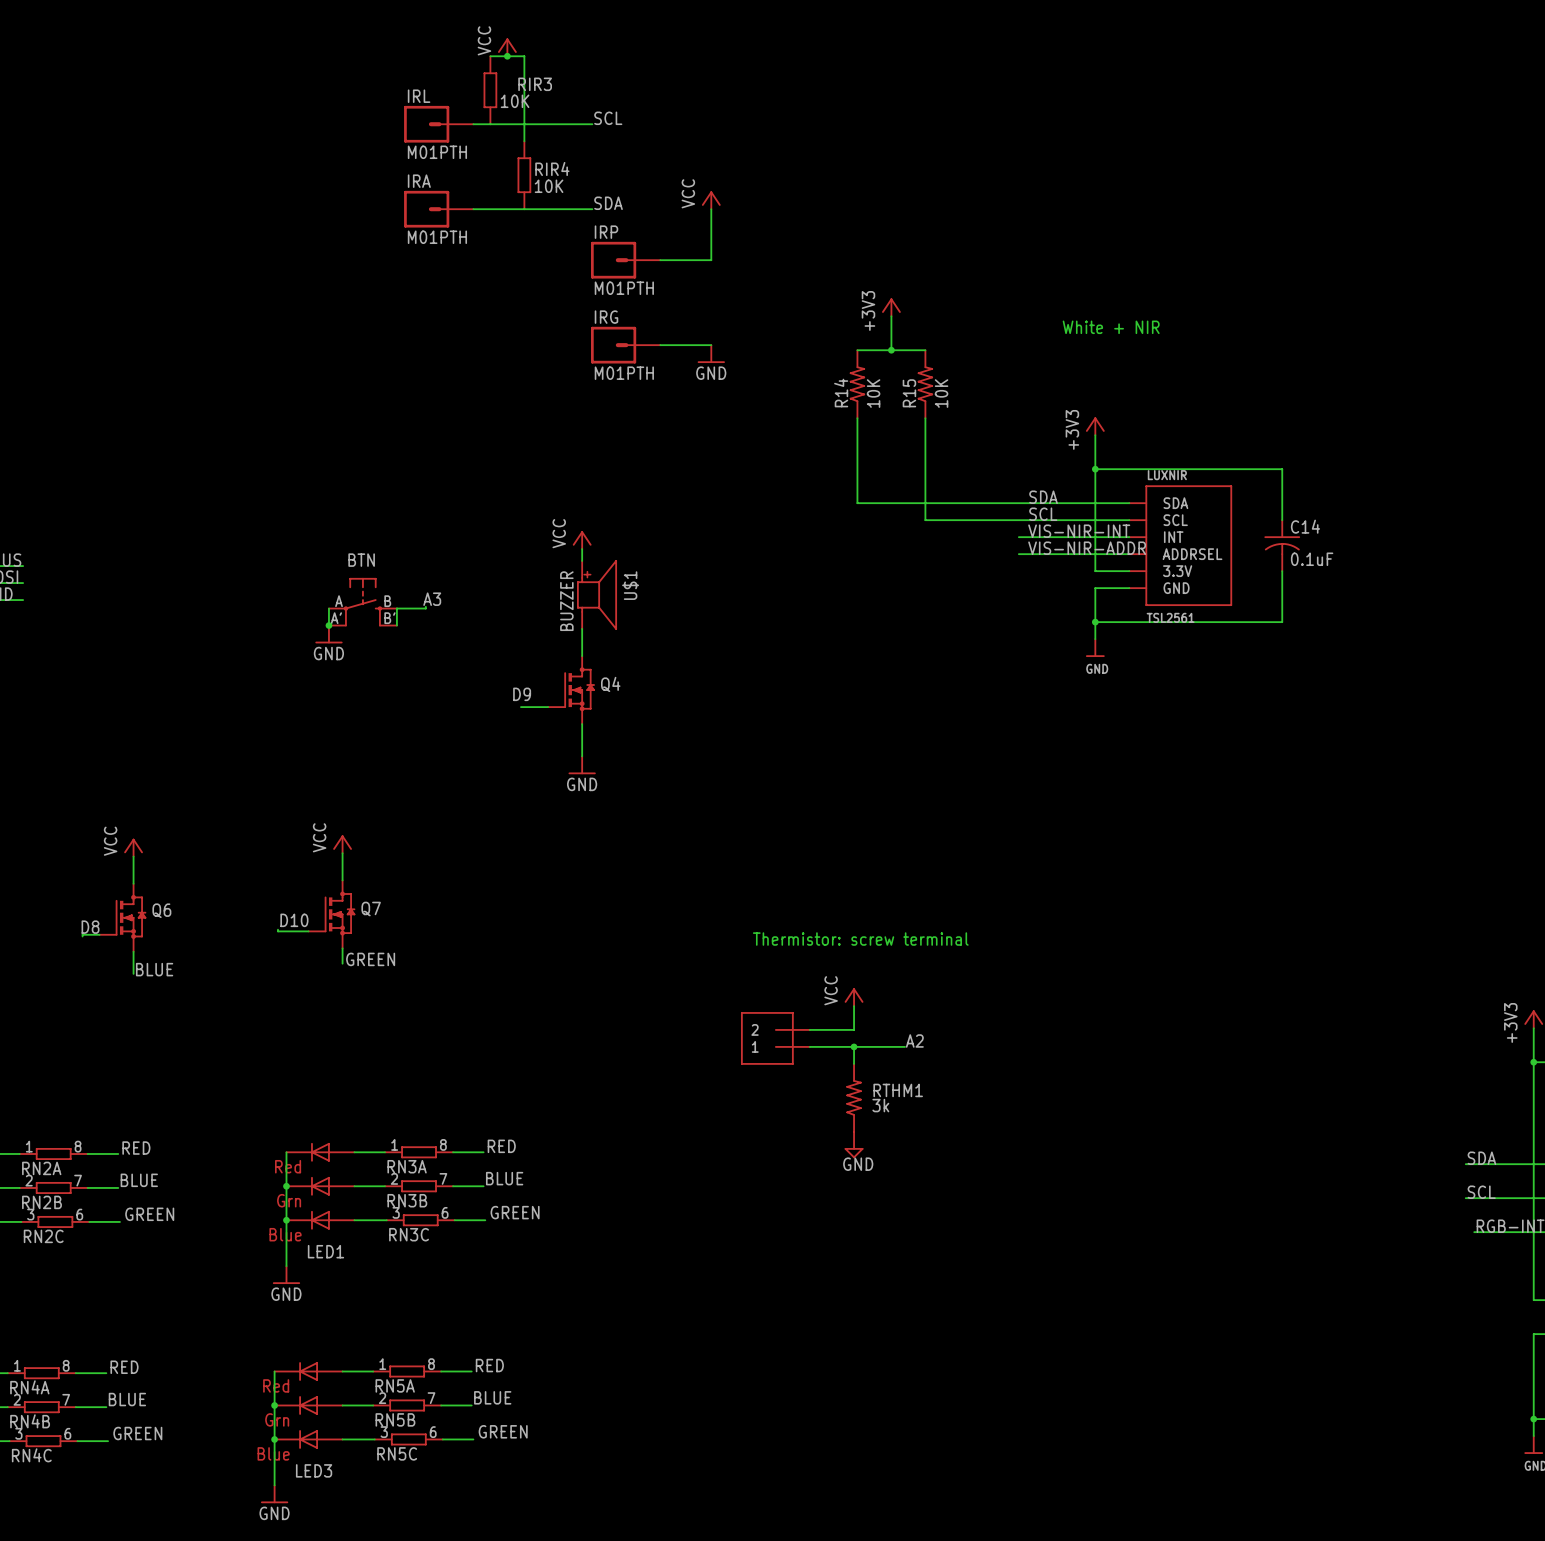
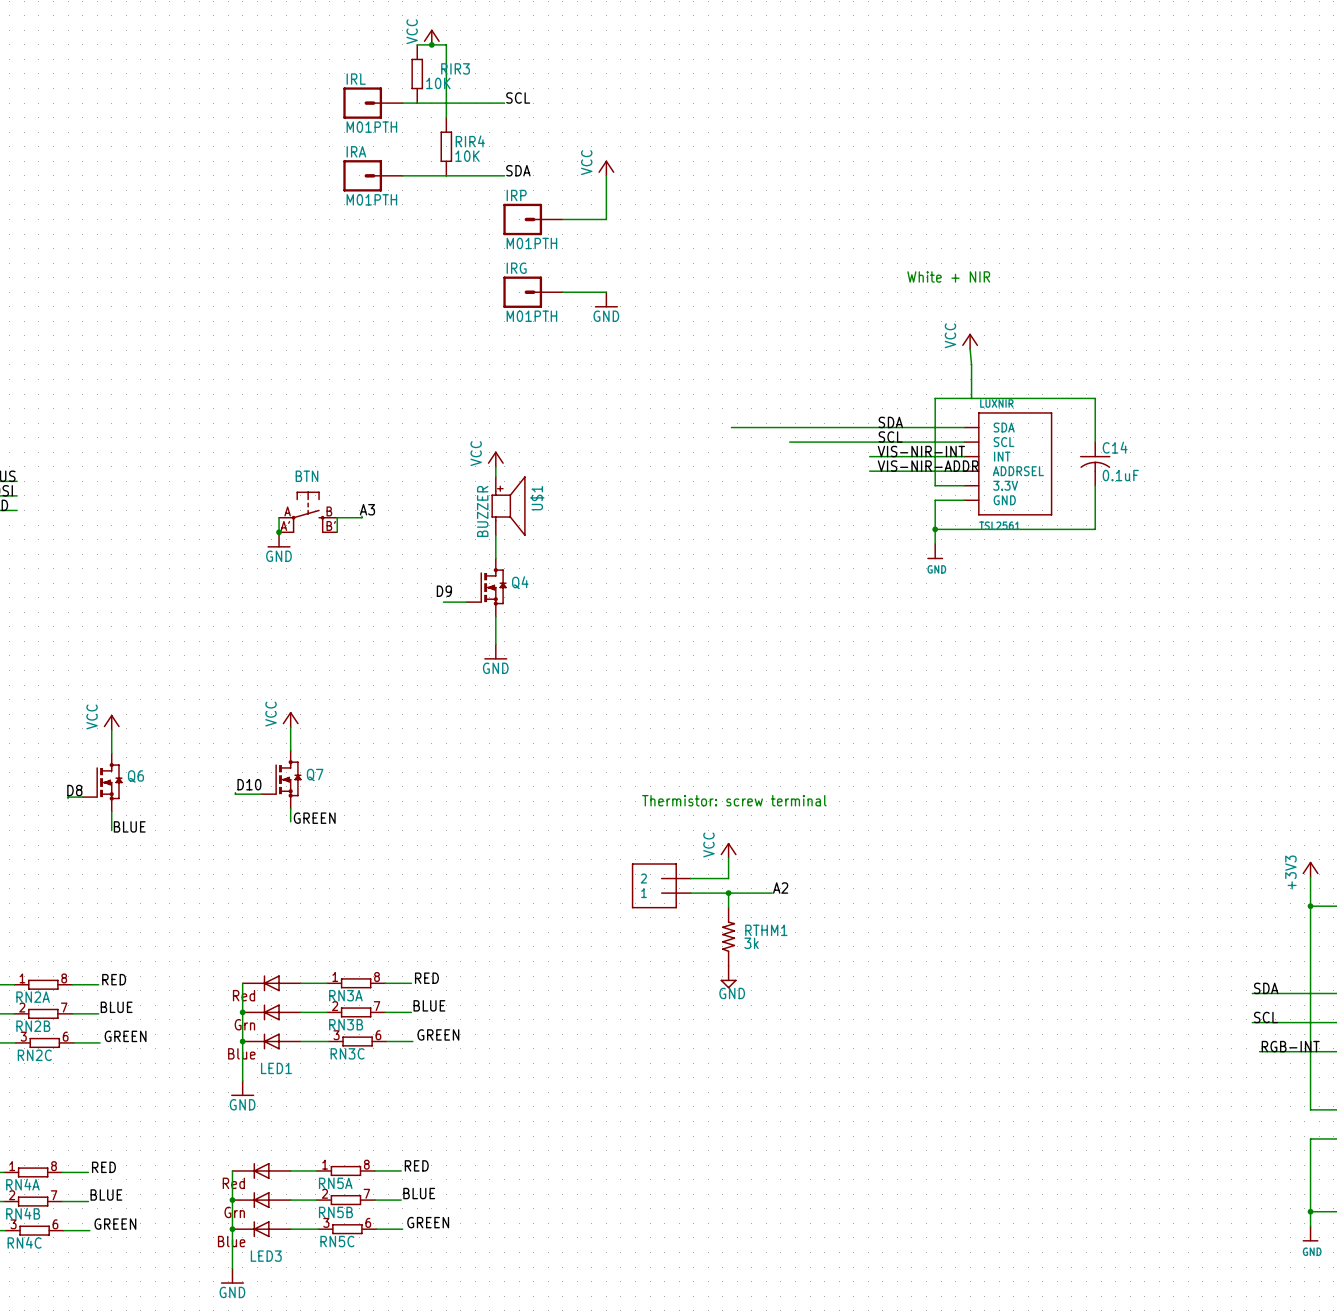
power symbol: +3V3 (891, 307) -> none
wire: (891, 316) (891, 350) -> none
wire: (857, 350) (925, 350) -> none
junction: (891, 350) -> none
R14: 10K (857, 384) -> none
R15: 10K (925, 384) -> none
power symbol: none -> VCC (970, 341)
wire: none -> (970, 348) (971, 398)
wire: (857, 418) (857, 503) -> none
wire: (925, 418) (925, 520) -> none
power symbol: +3V3 (1095, 426) -> none
wire: (1095, 435) (1095, 469) -> none
junction: (1095, 469) -> none

